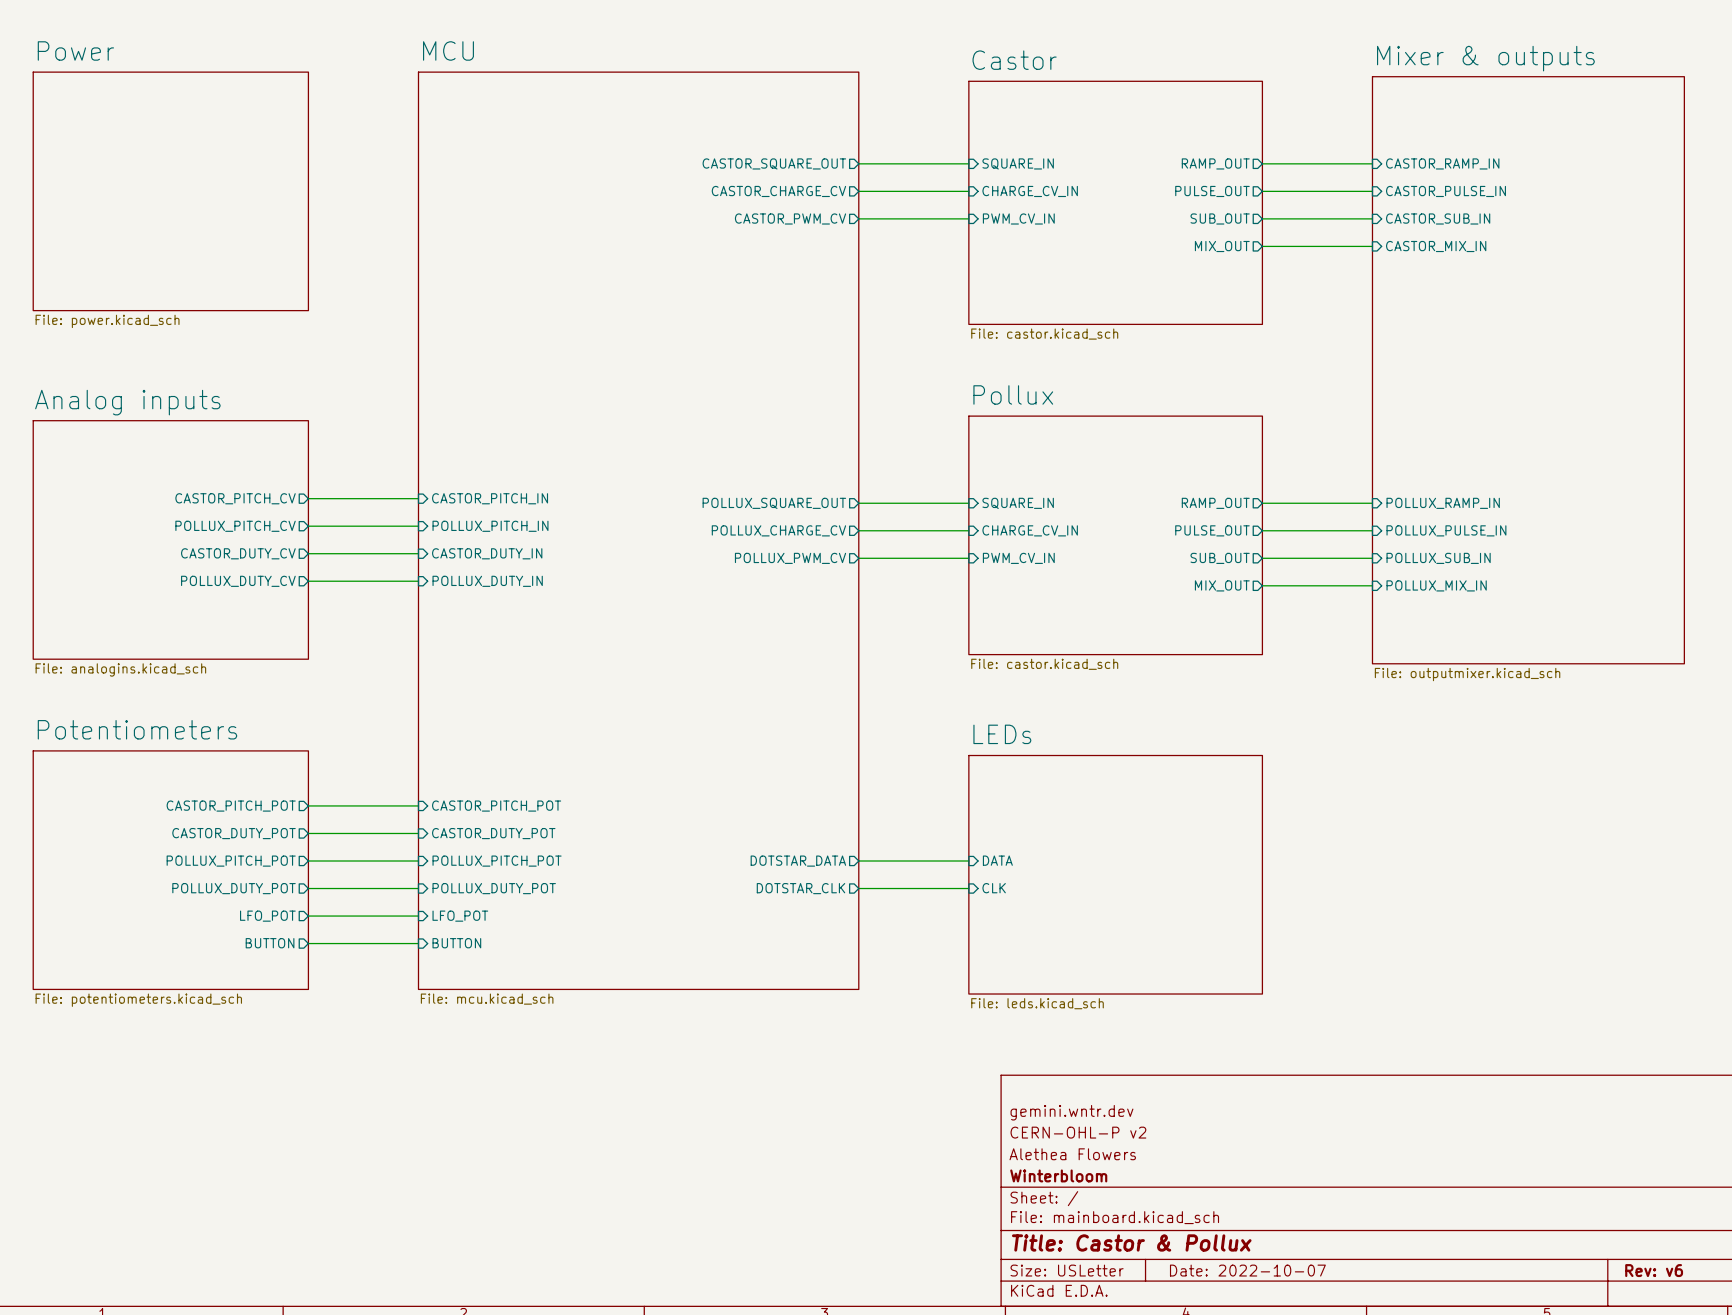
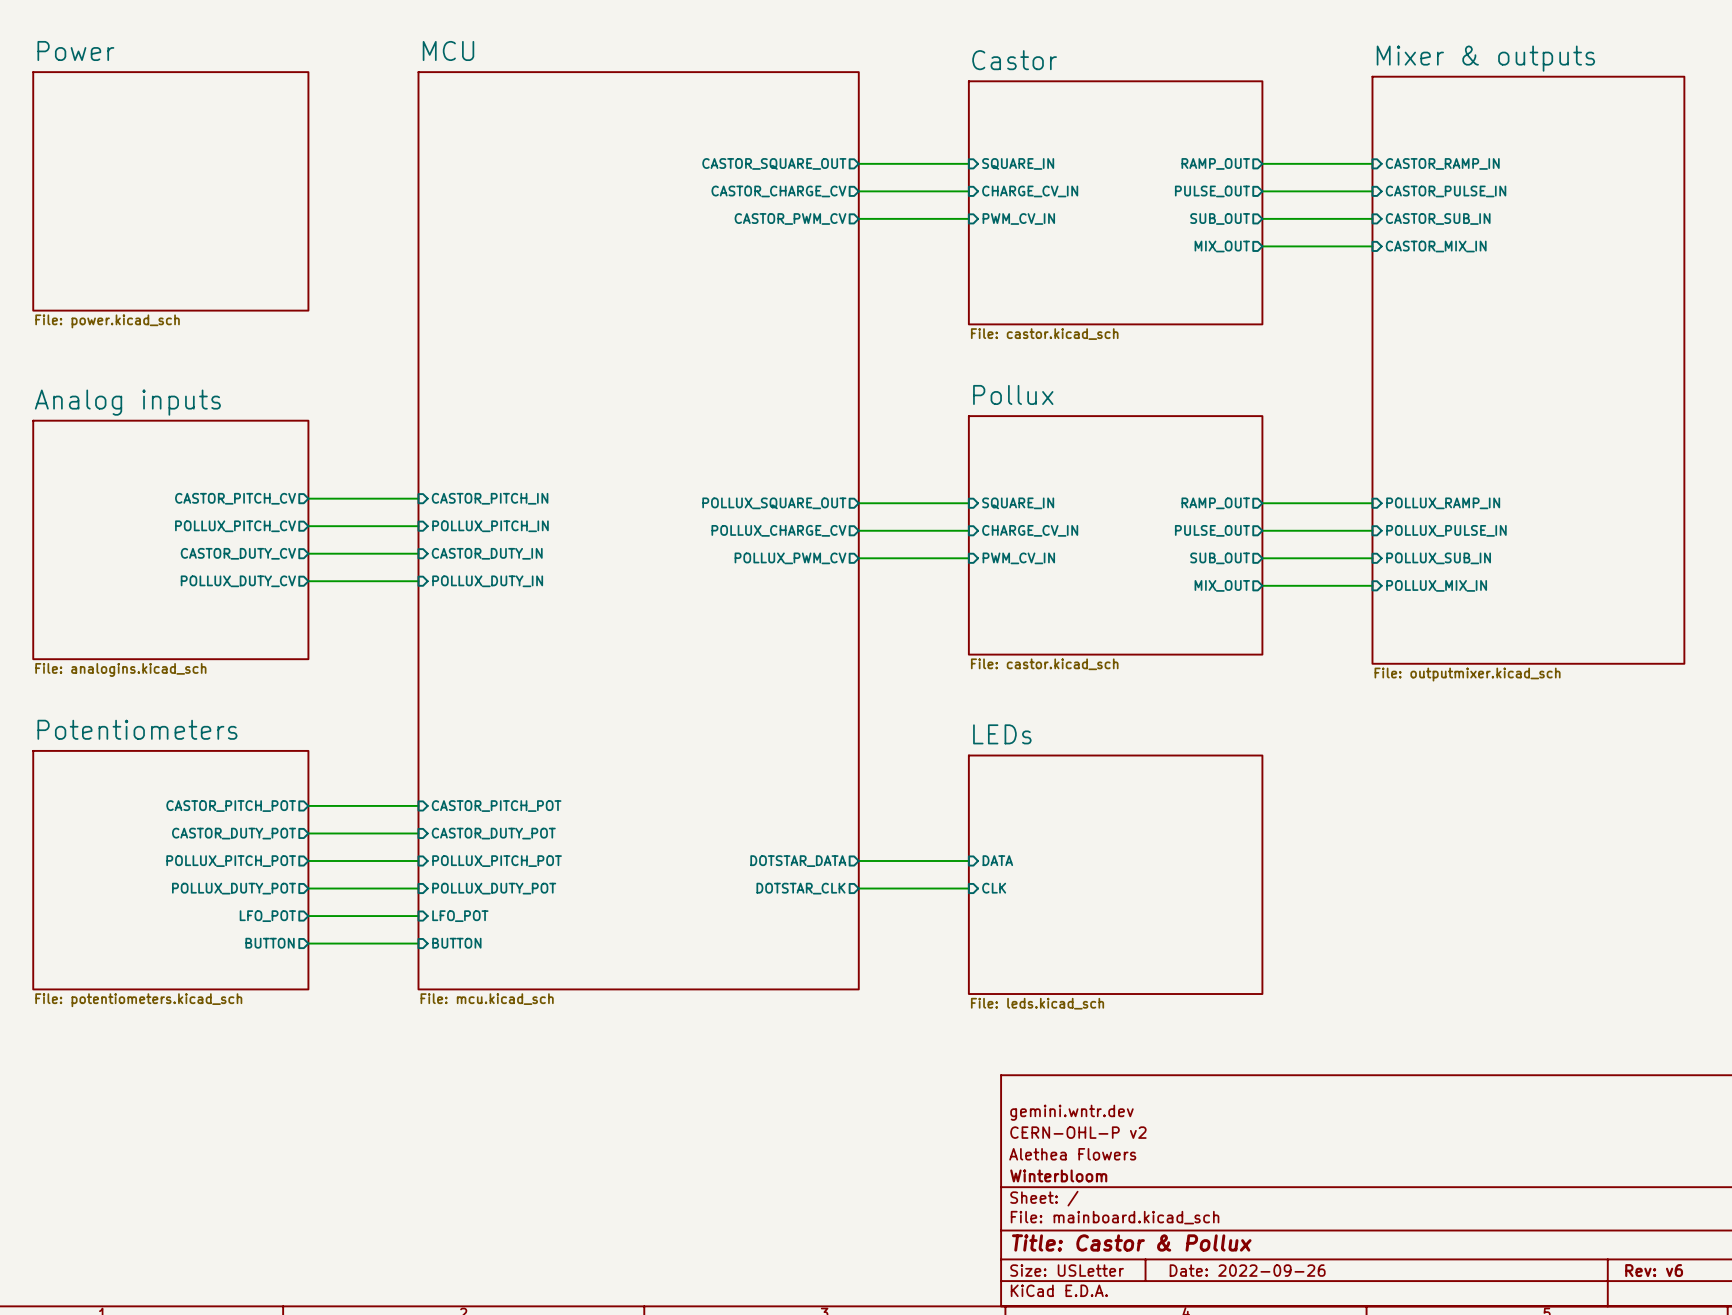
title block: Date: 2022-10-07 (1247, 1270) -> Date: 2022-09-26 (1247, 1270)

